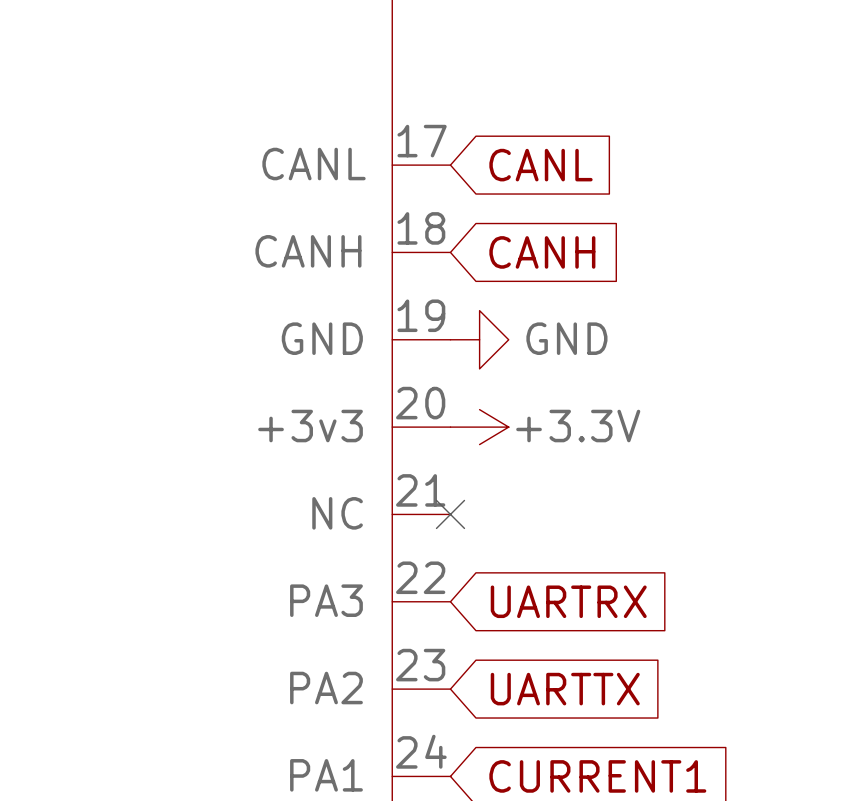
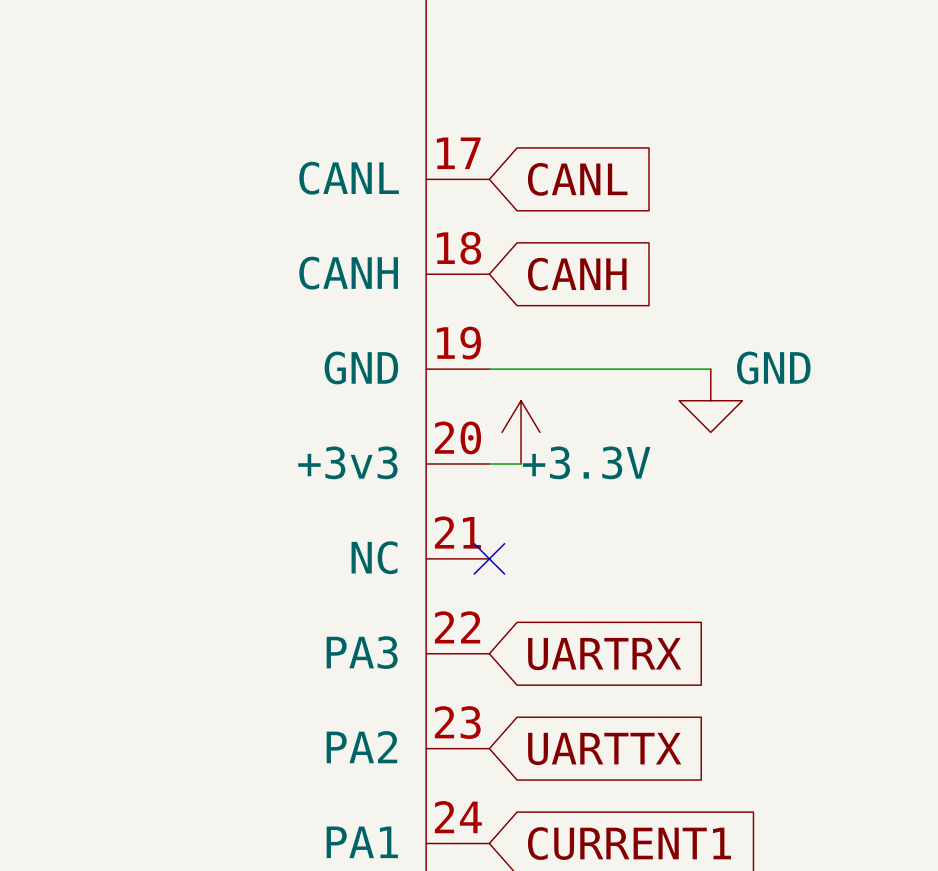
wire: none -> (489, 369) (710, 369)
power symbol rotation: 0° (479, 339) -> 90° clockwise (710, 400)
power symbol position: GND (479, 339) -> GND (710, 400)
power symbol rotation: 0° (479, 427) -> 90° counterclockwise (521, 432)

